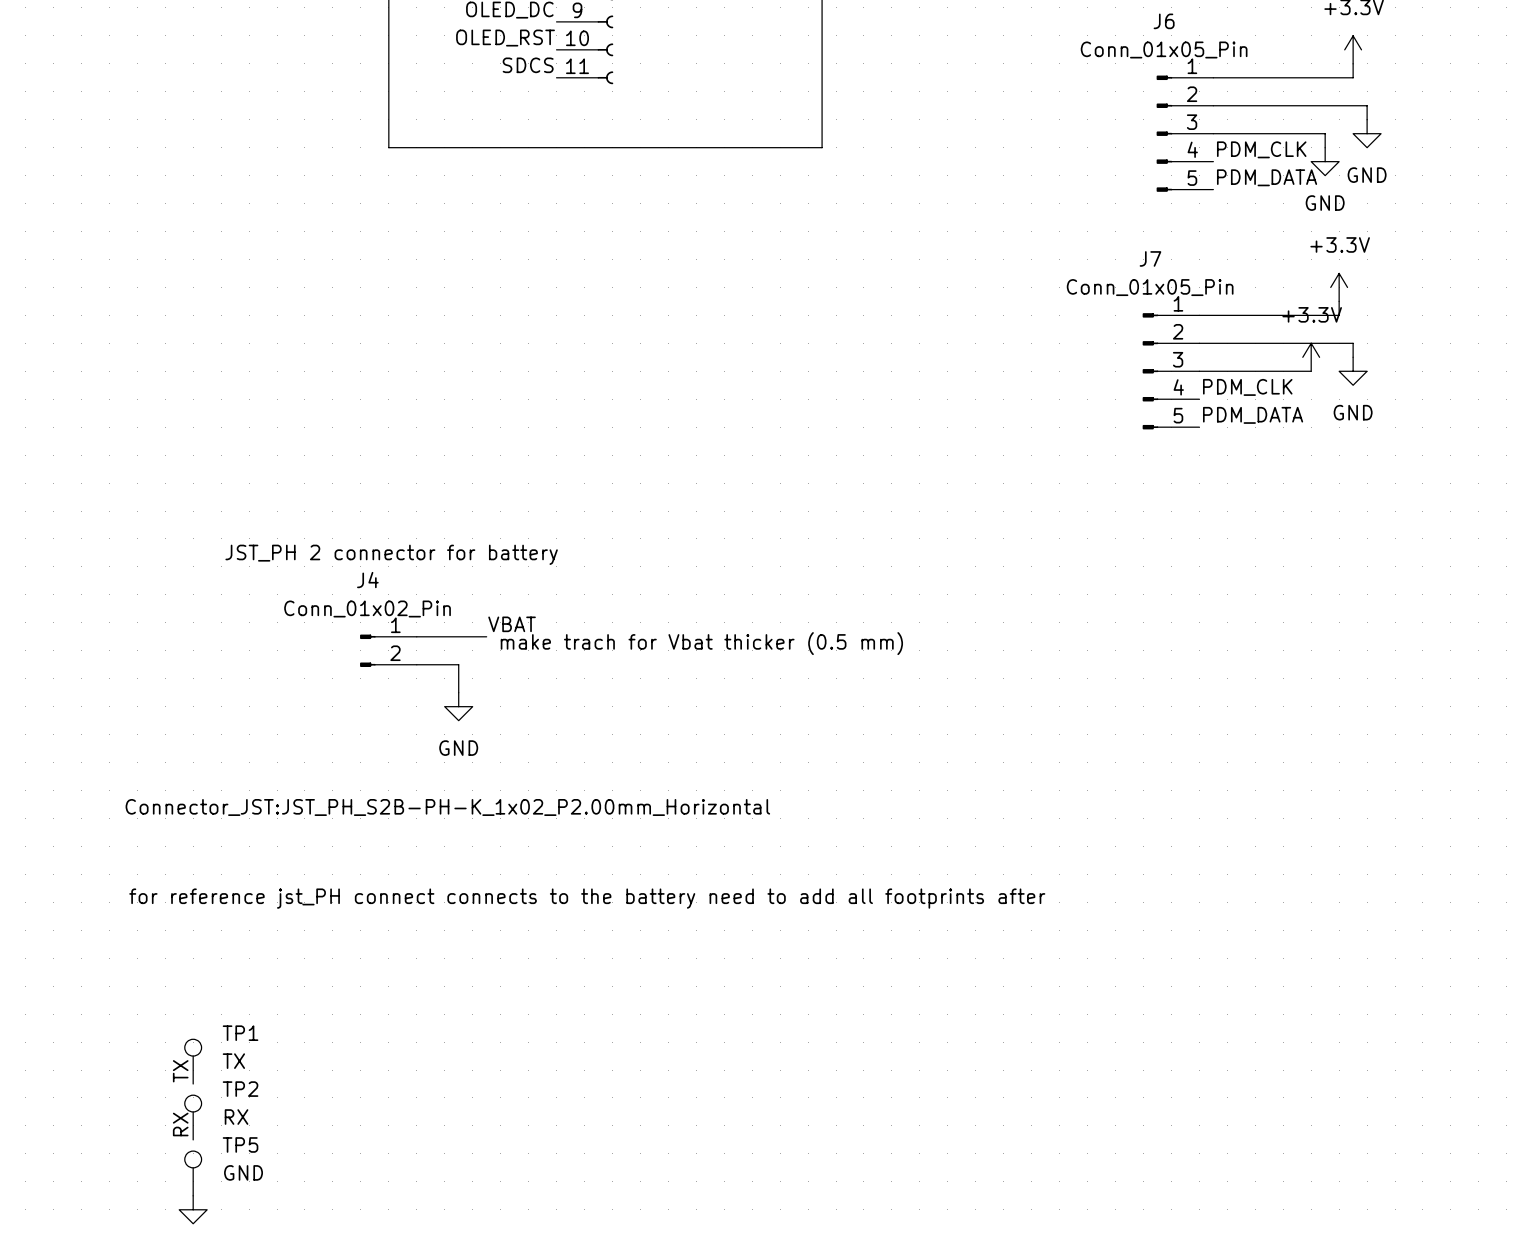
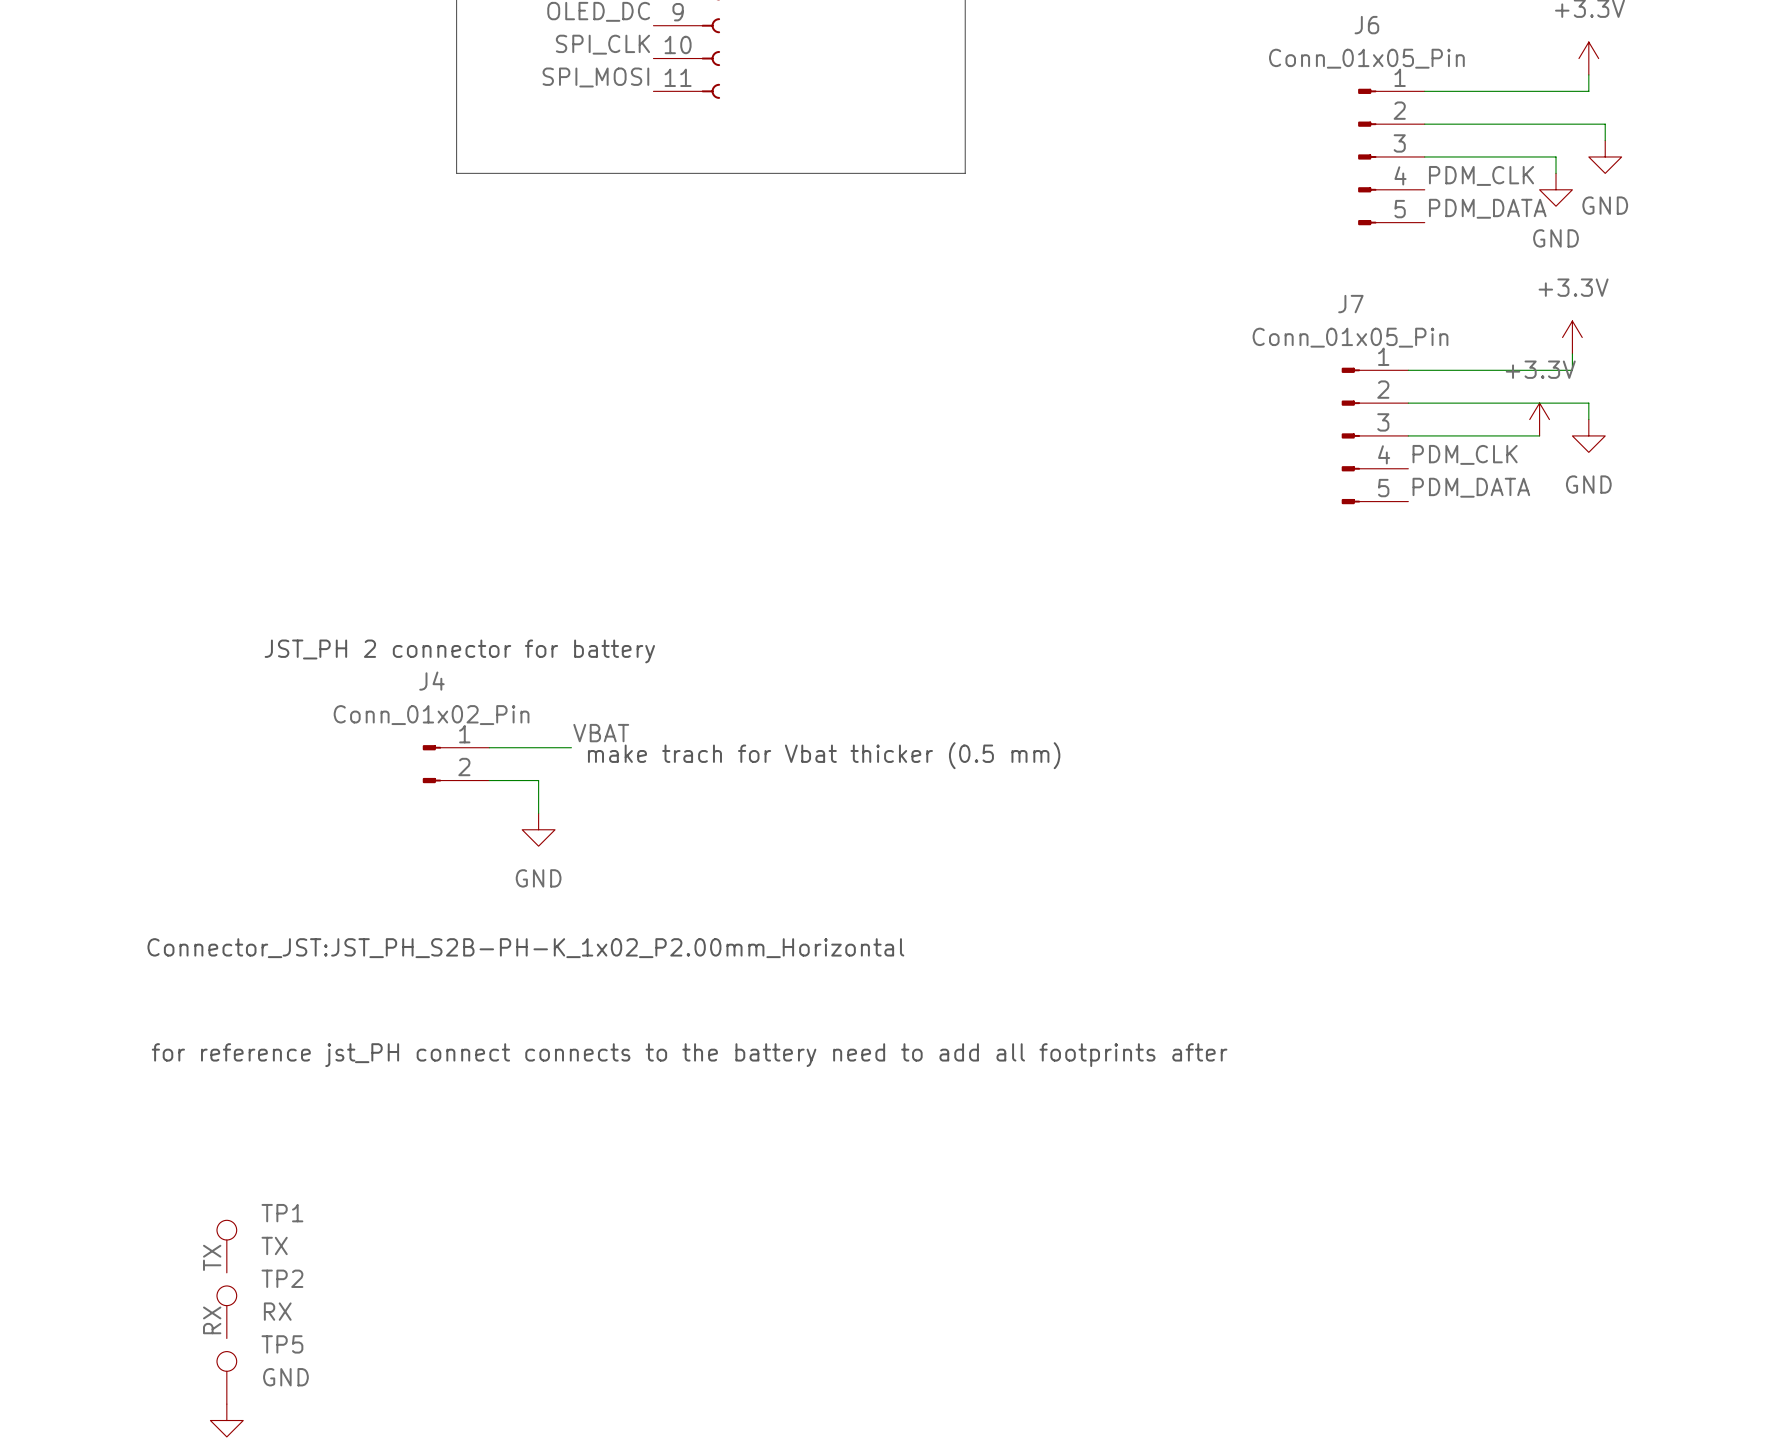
label: OLED_RST (505, 38) -> SPI_CLK (602, 44)
label: SDCS (528, 65) -> SPI_MOSI (595, 77)

